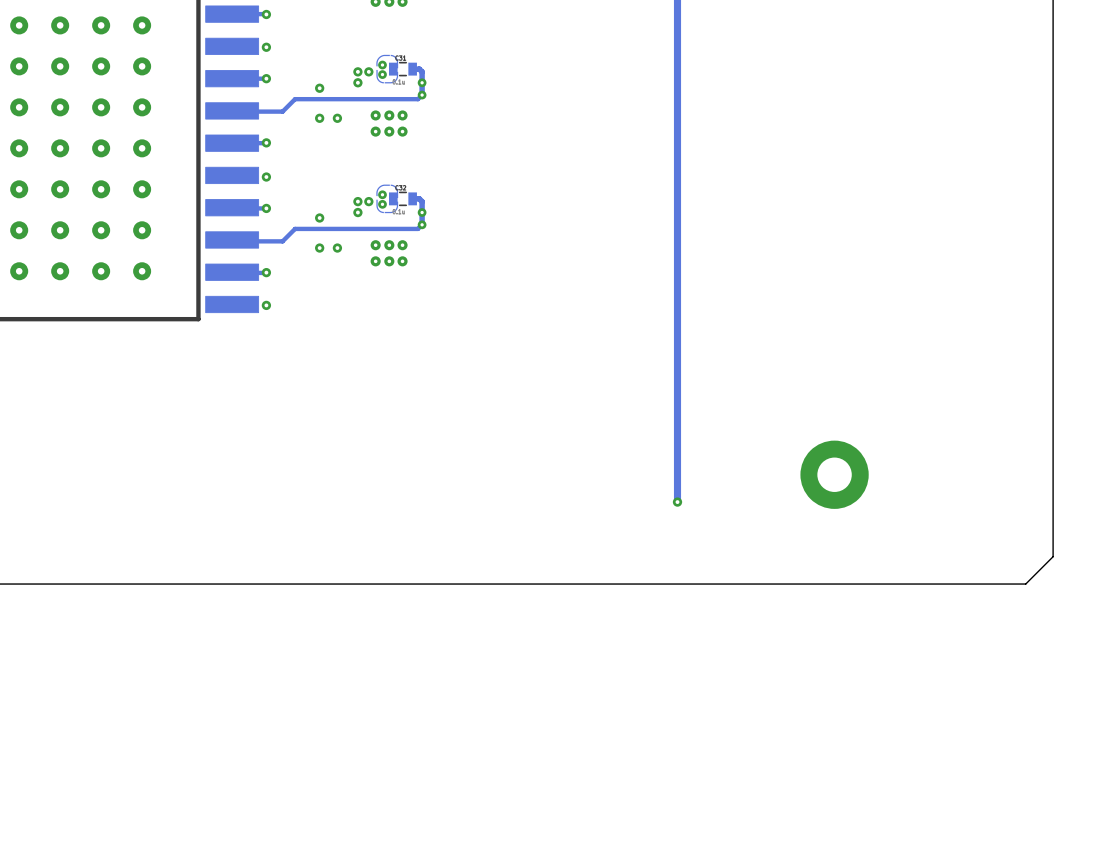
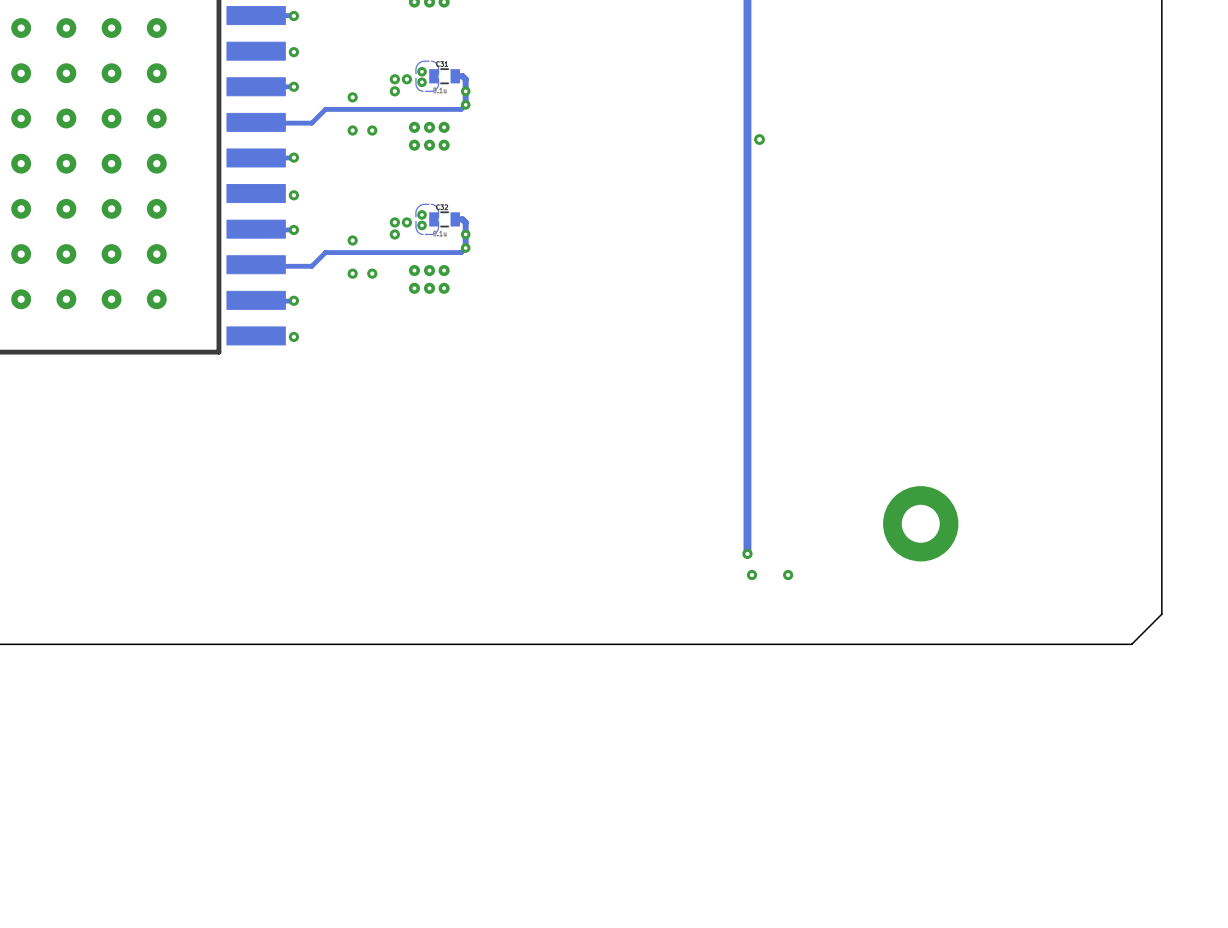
via: none -> (759, 139)
via: none -> (751, 575)
via: none -> (788, 575)

